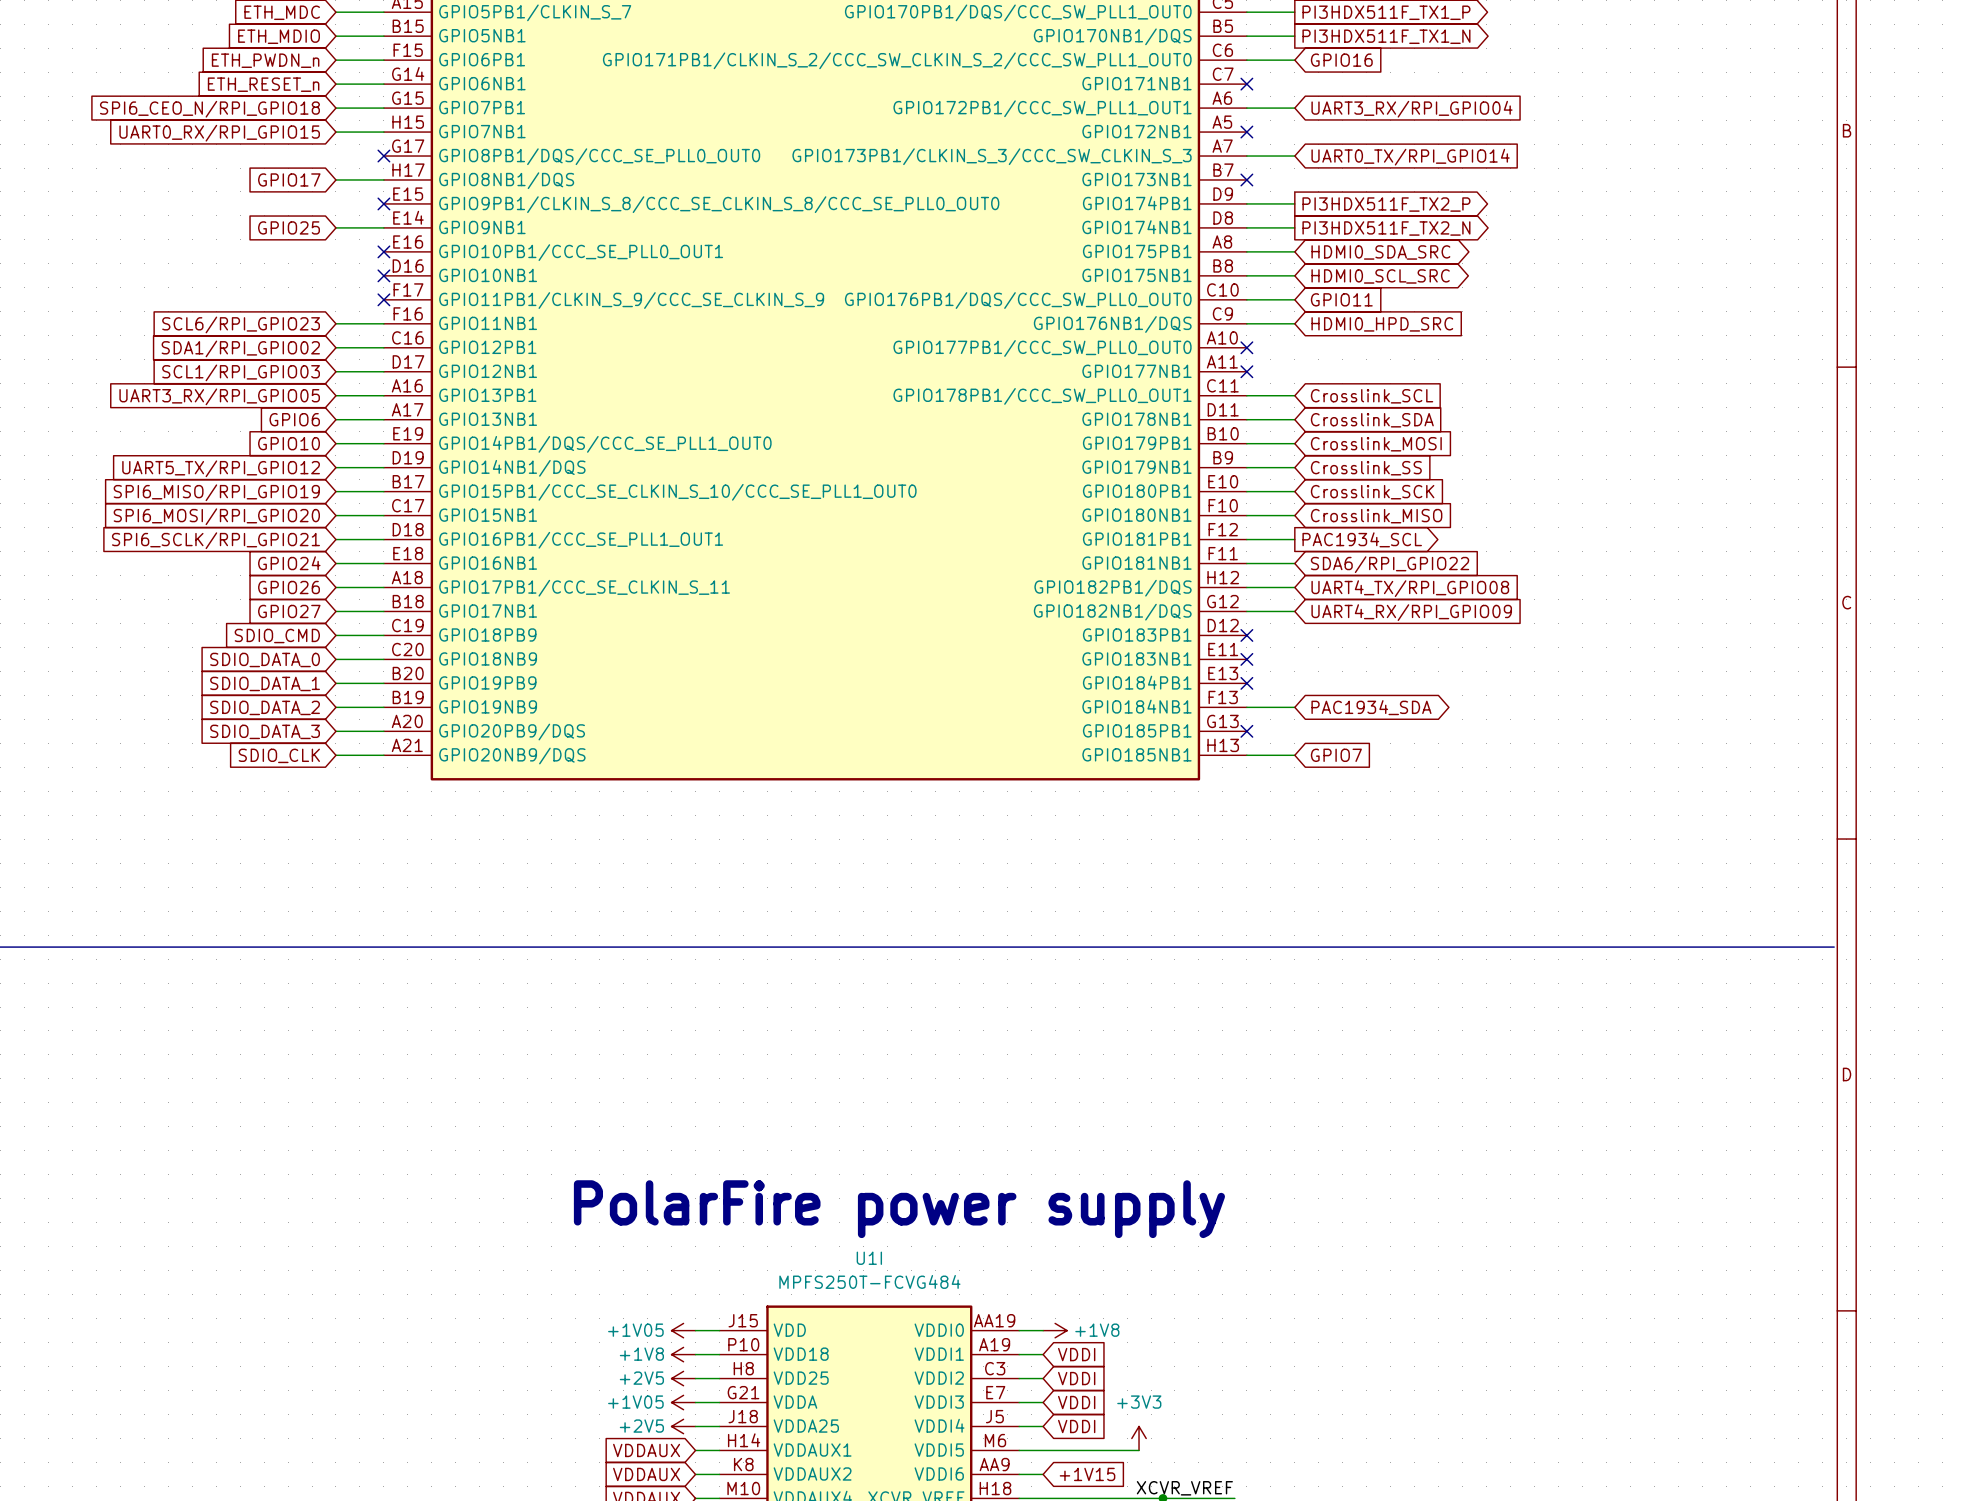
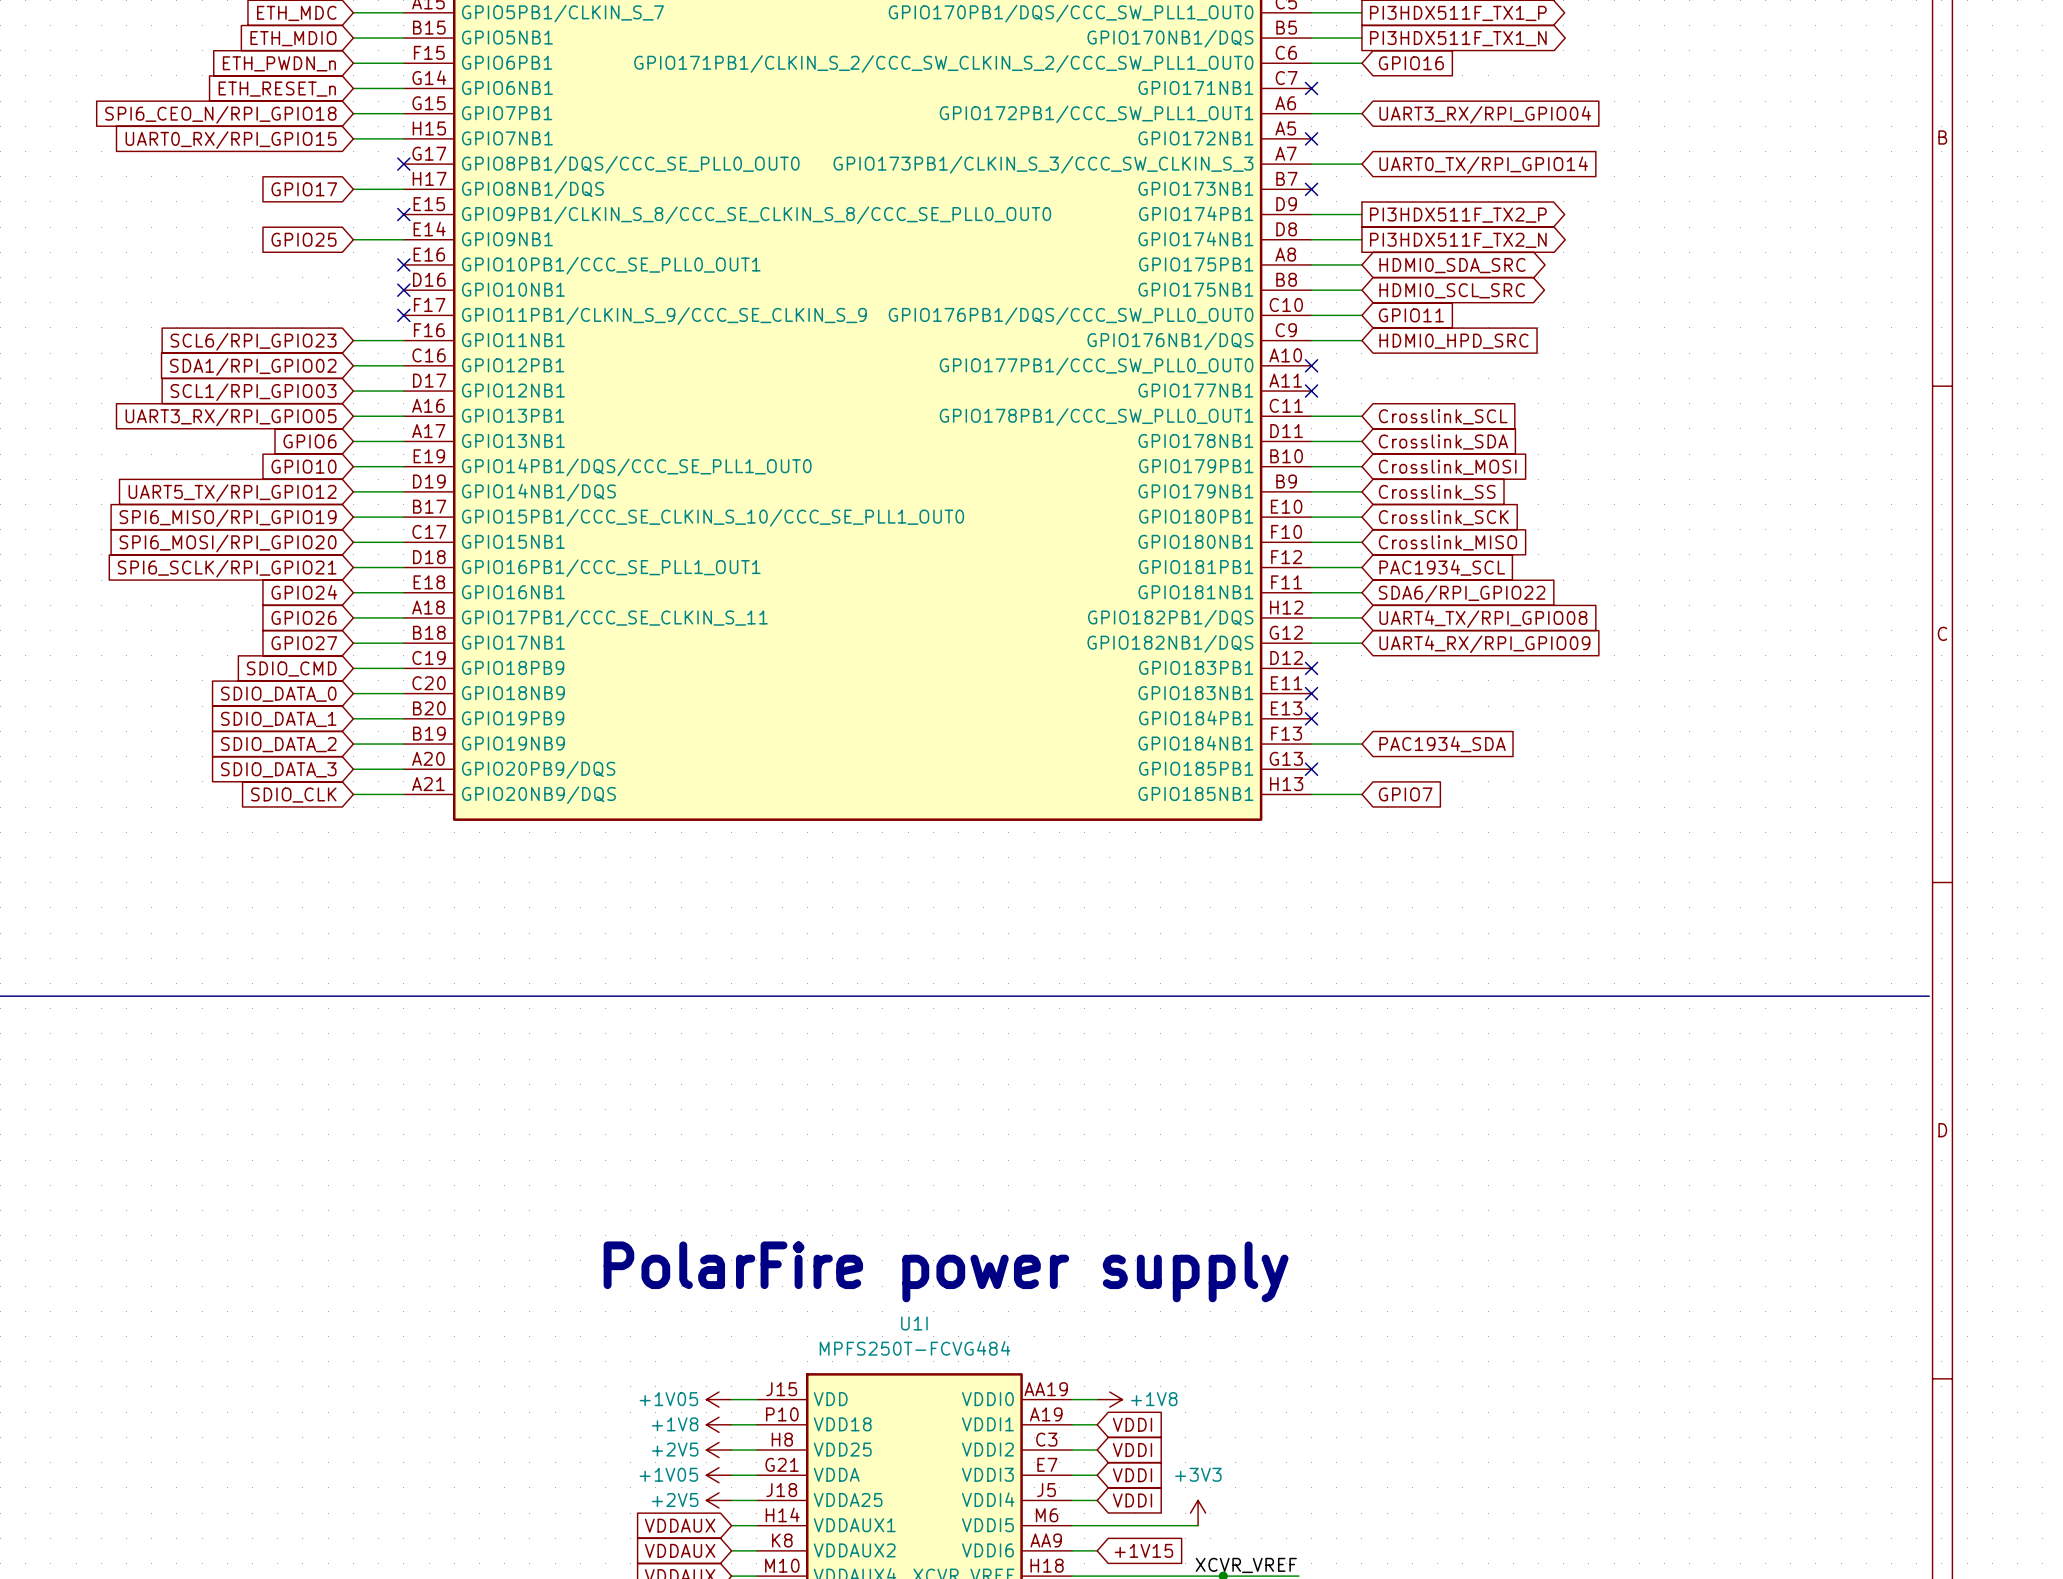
global label shape: output (1362, 539) -> input (1442, 567)
global label shape: bidirectional (1371, 707) -> input (1442, 744)

